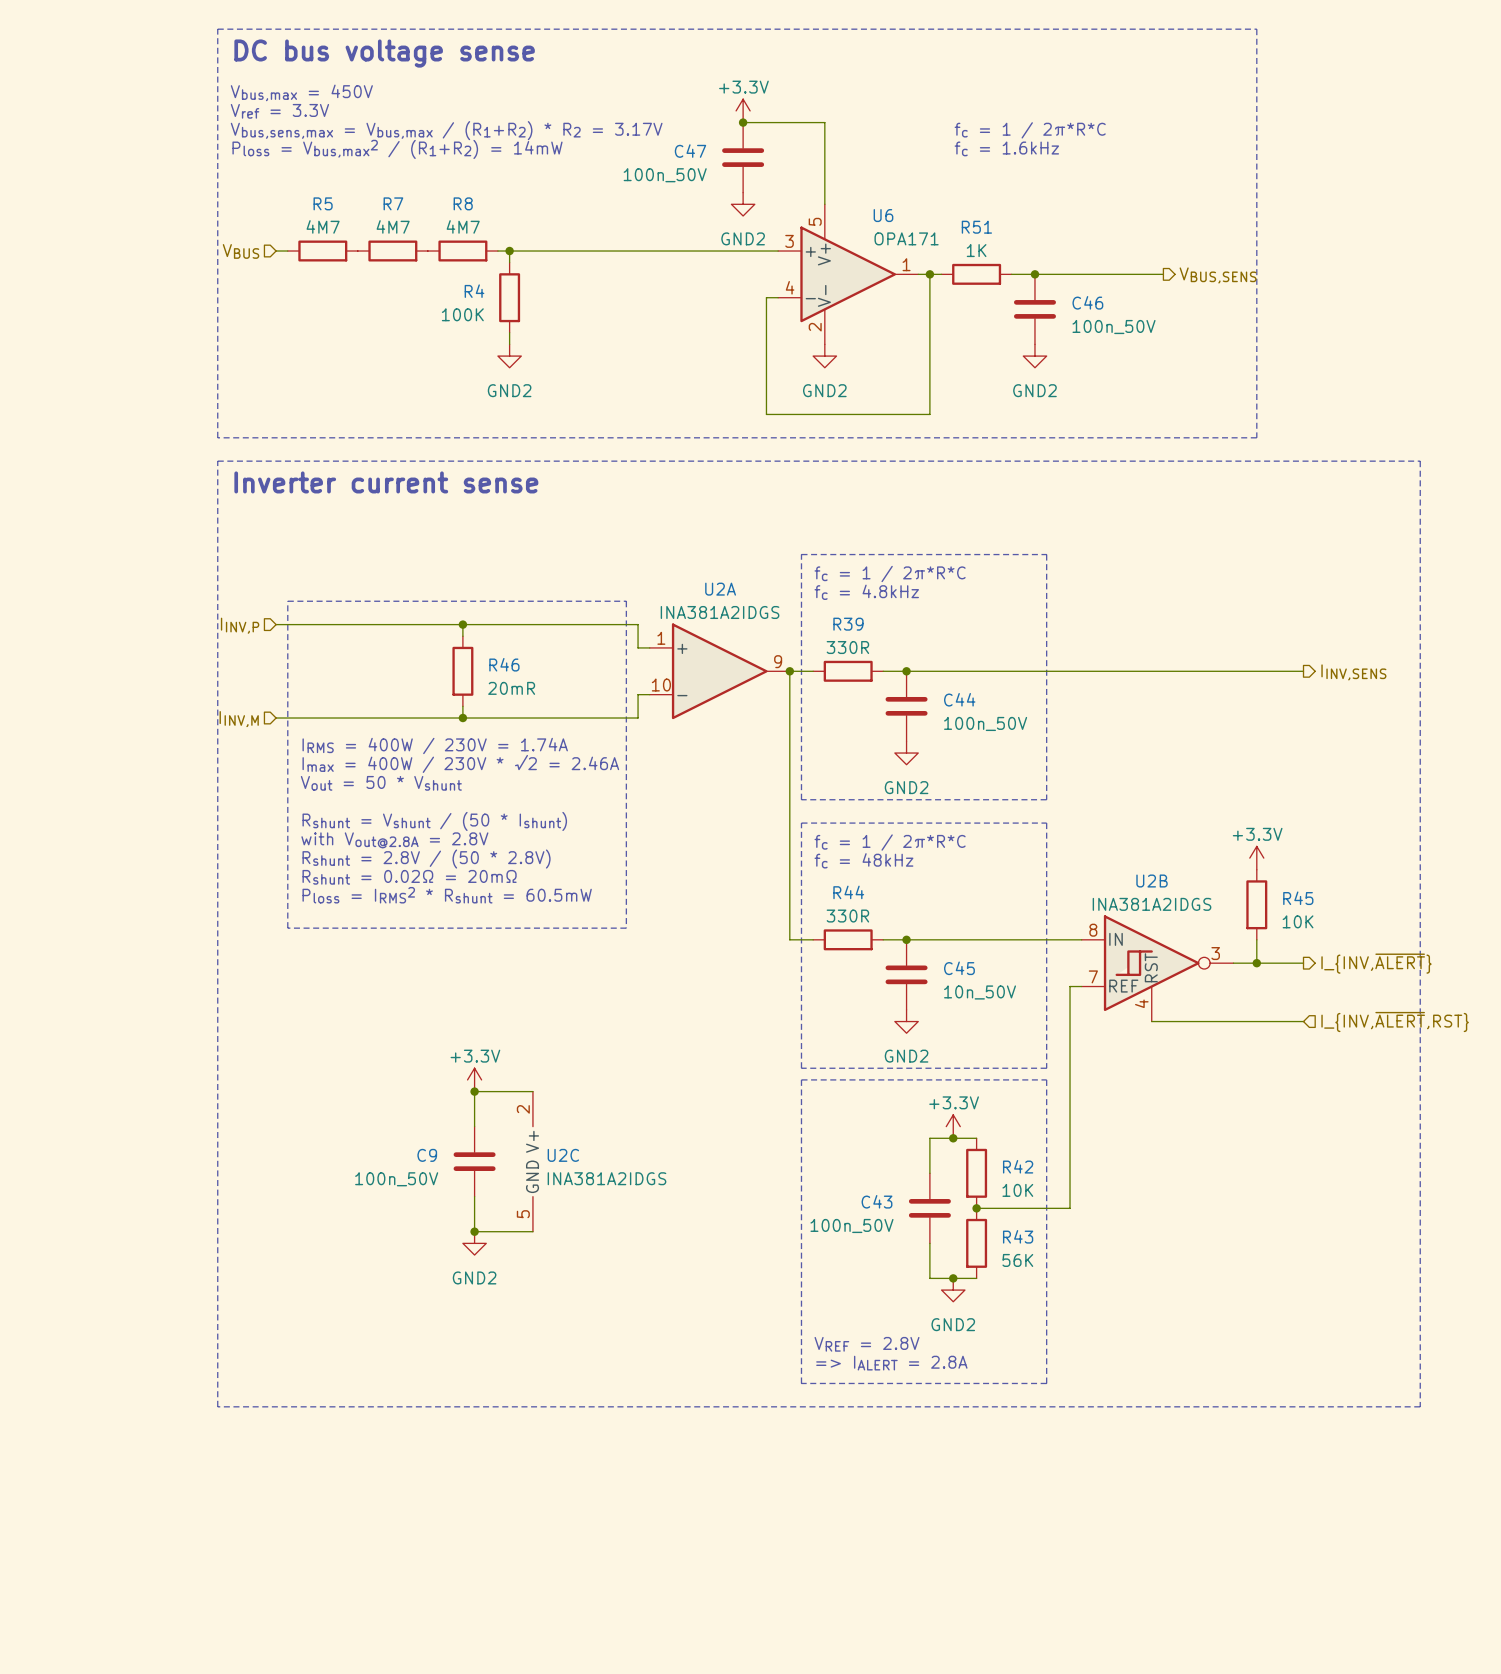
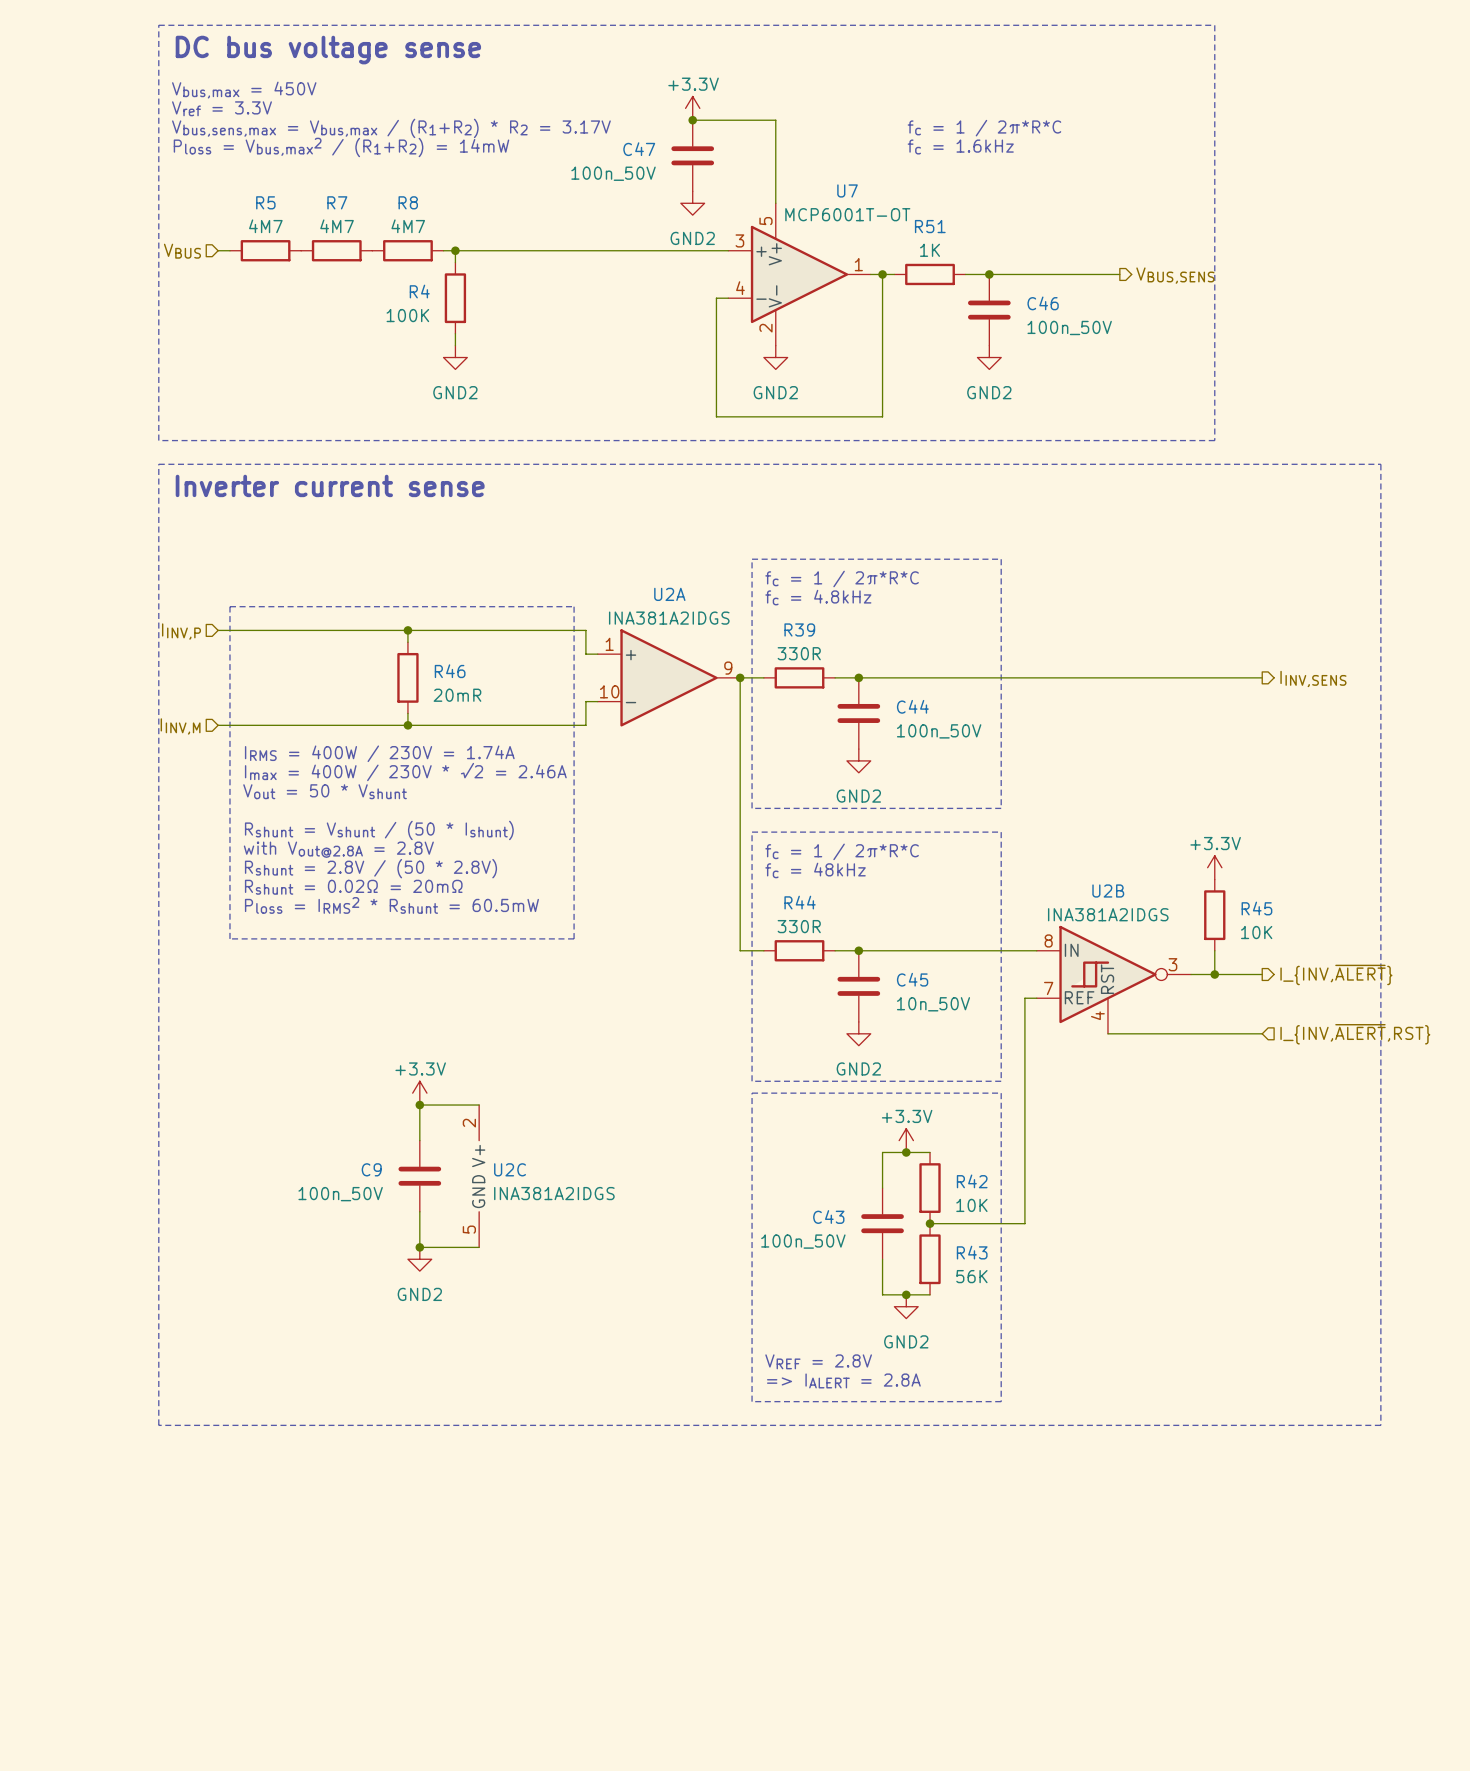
U6 name: U6 (883, 215) -> U7 (847, 190)
U6 value: OPA171 (906, 238) -> MCP6001T-OT (847, 214)

